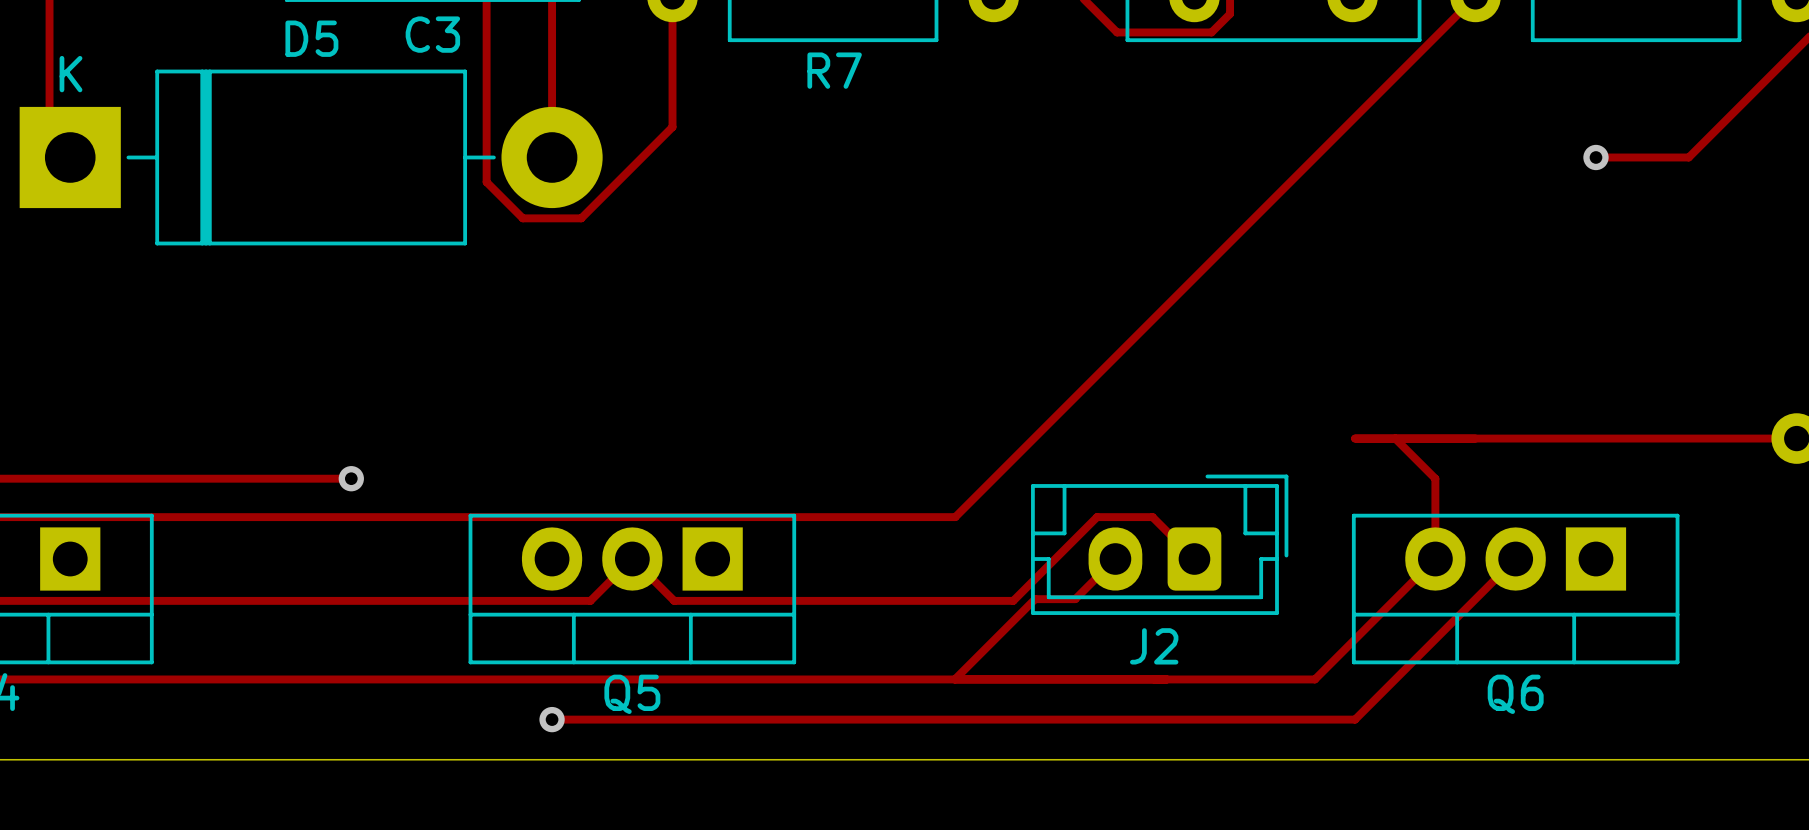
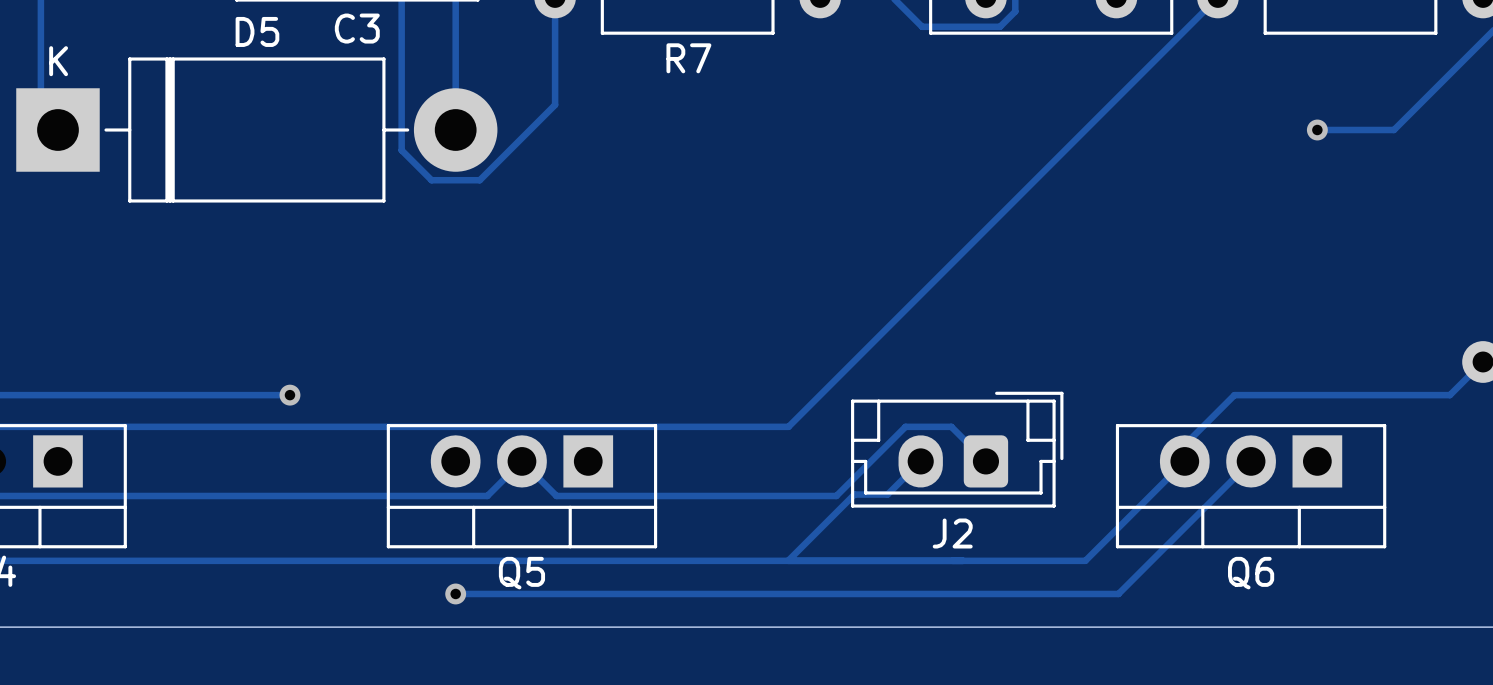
track: (1355, 438) (1796, 438) -> (1184, 444) (1234, 395) (1449, 395) (1483, 361)
track: (1395, 438) (1435, 478) (1435, 538) -> none

